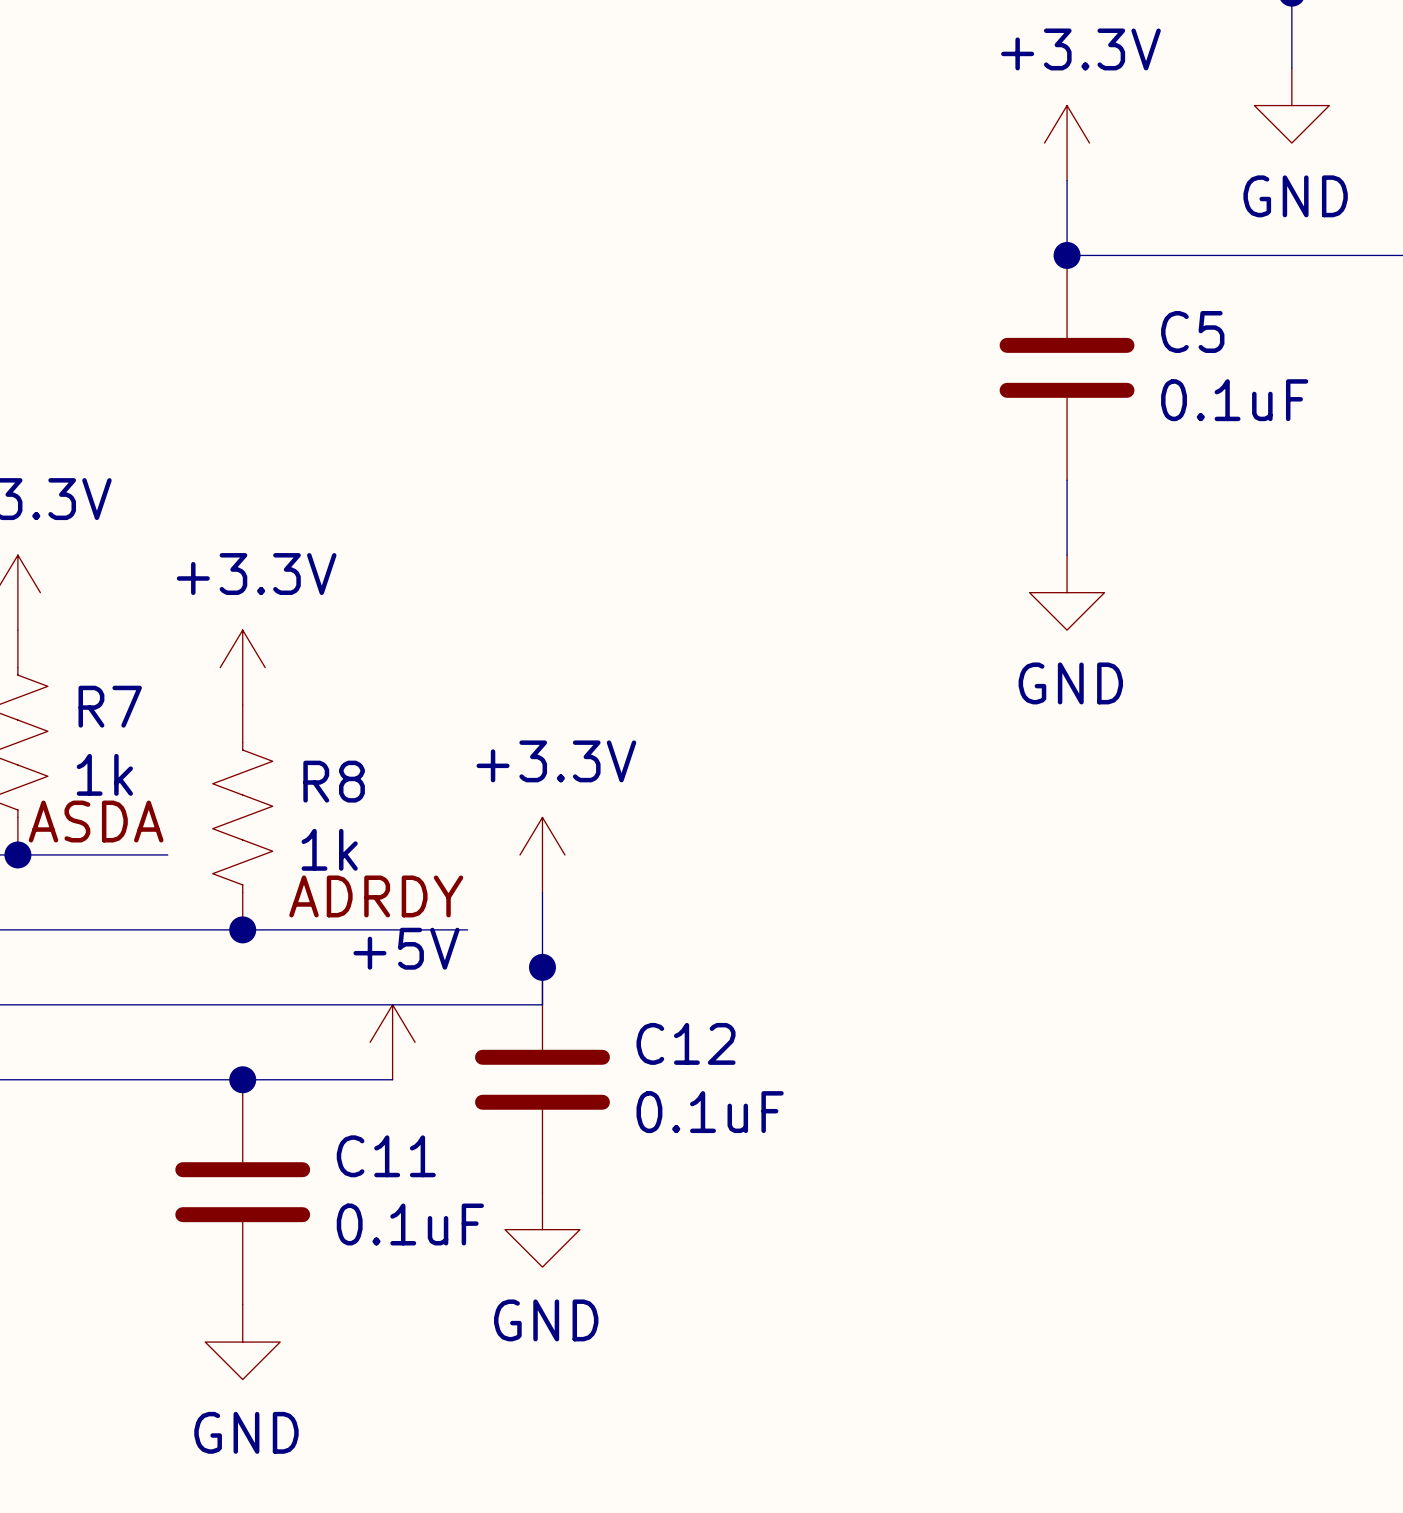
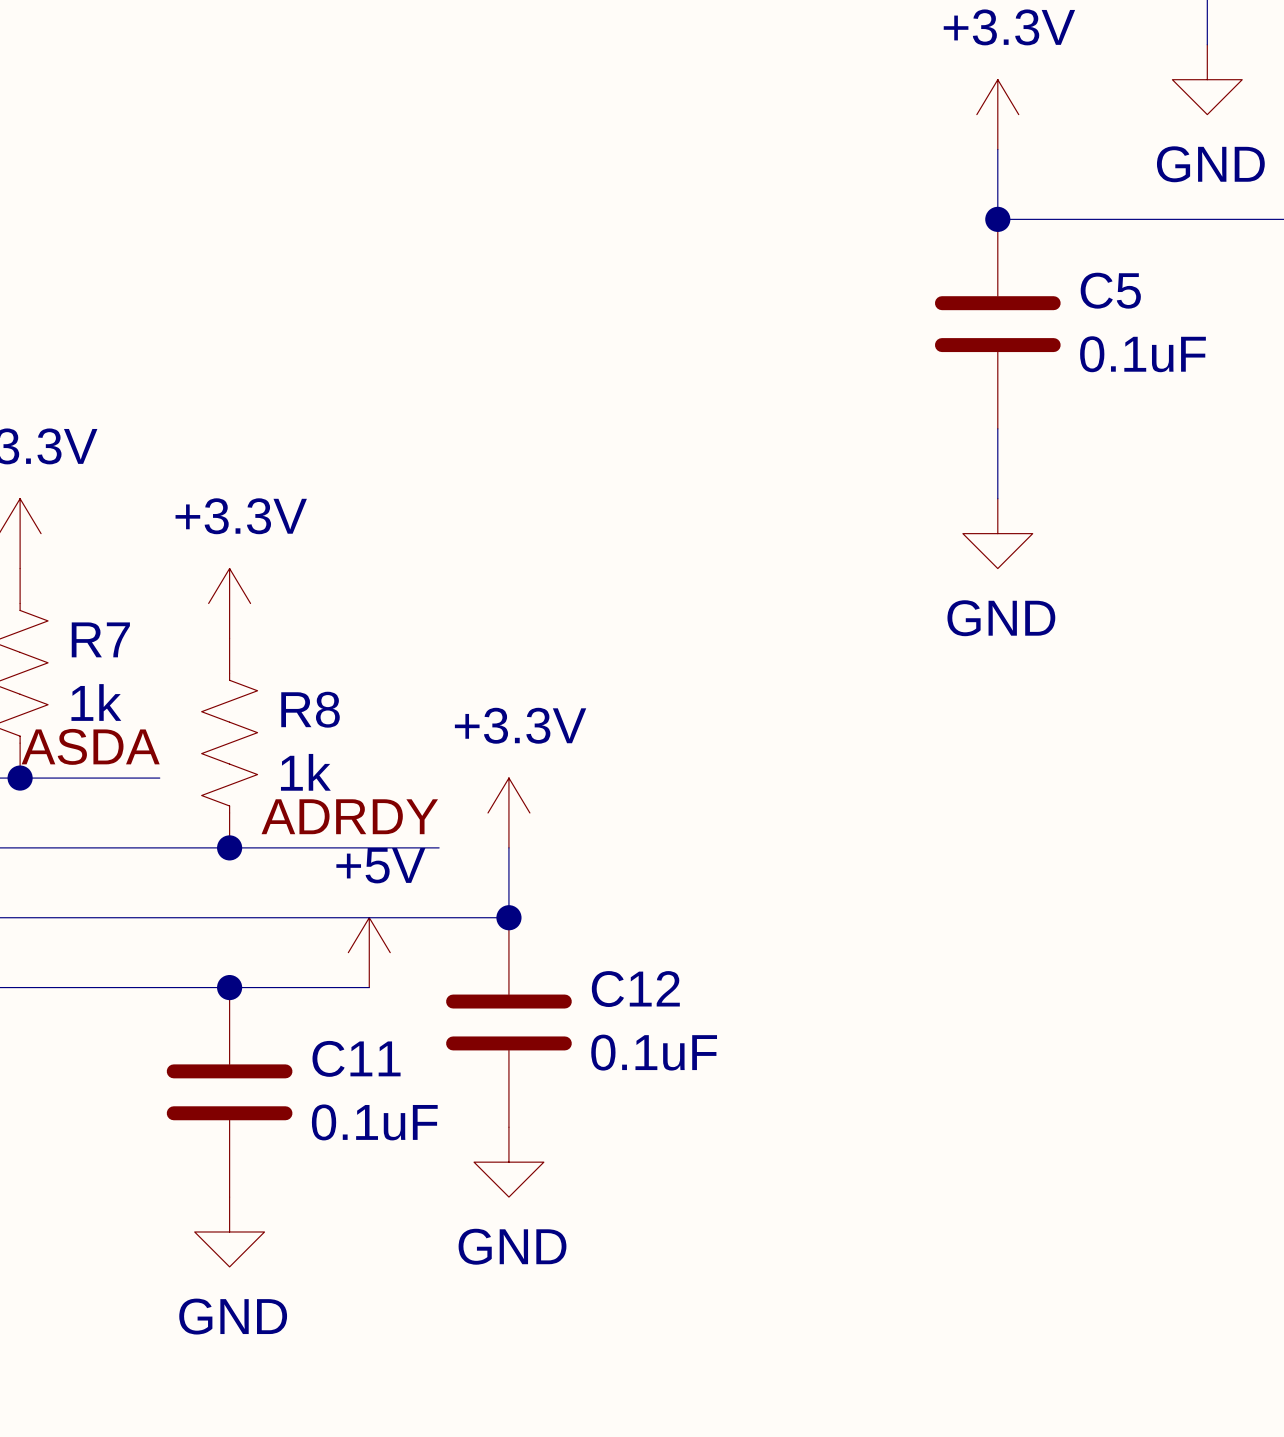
power symbol position: +3.3V (542, 854) -> +3.3V (508, 812)
junction position: (542, 967) -> (508, 917)
C12 position: (542, 1079) -> (508, 1022)
power symbol position: GND (542, 1229) -> GND (508, 1162)

